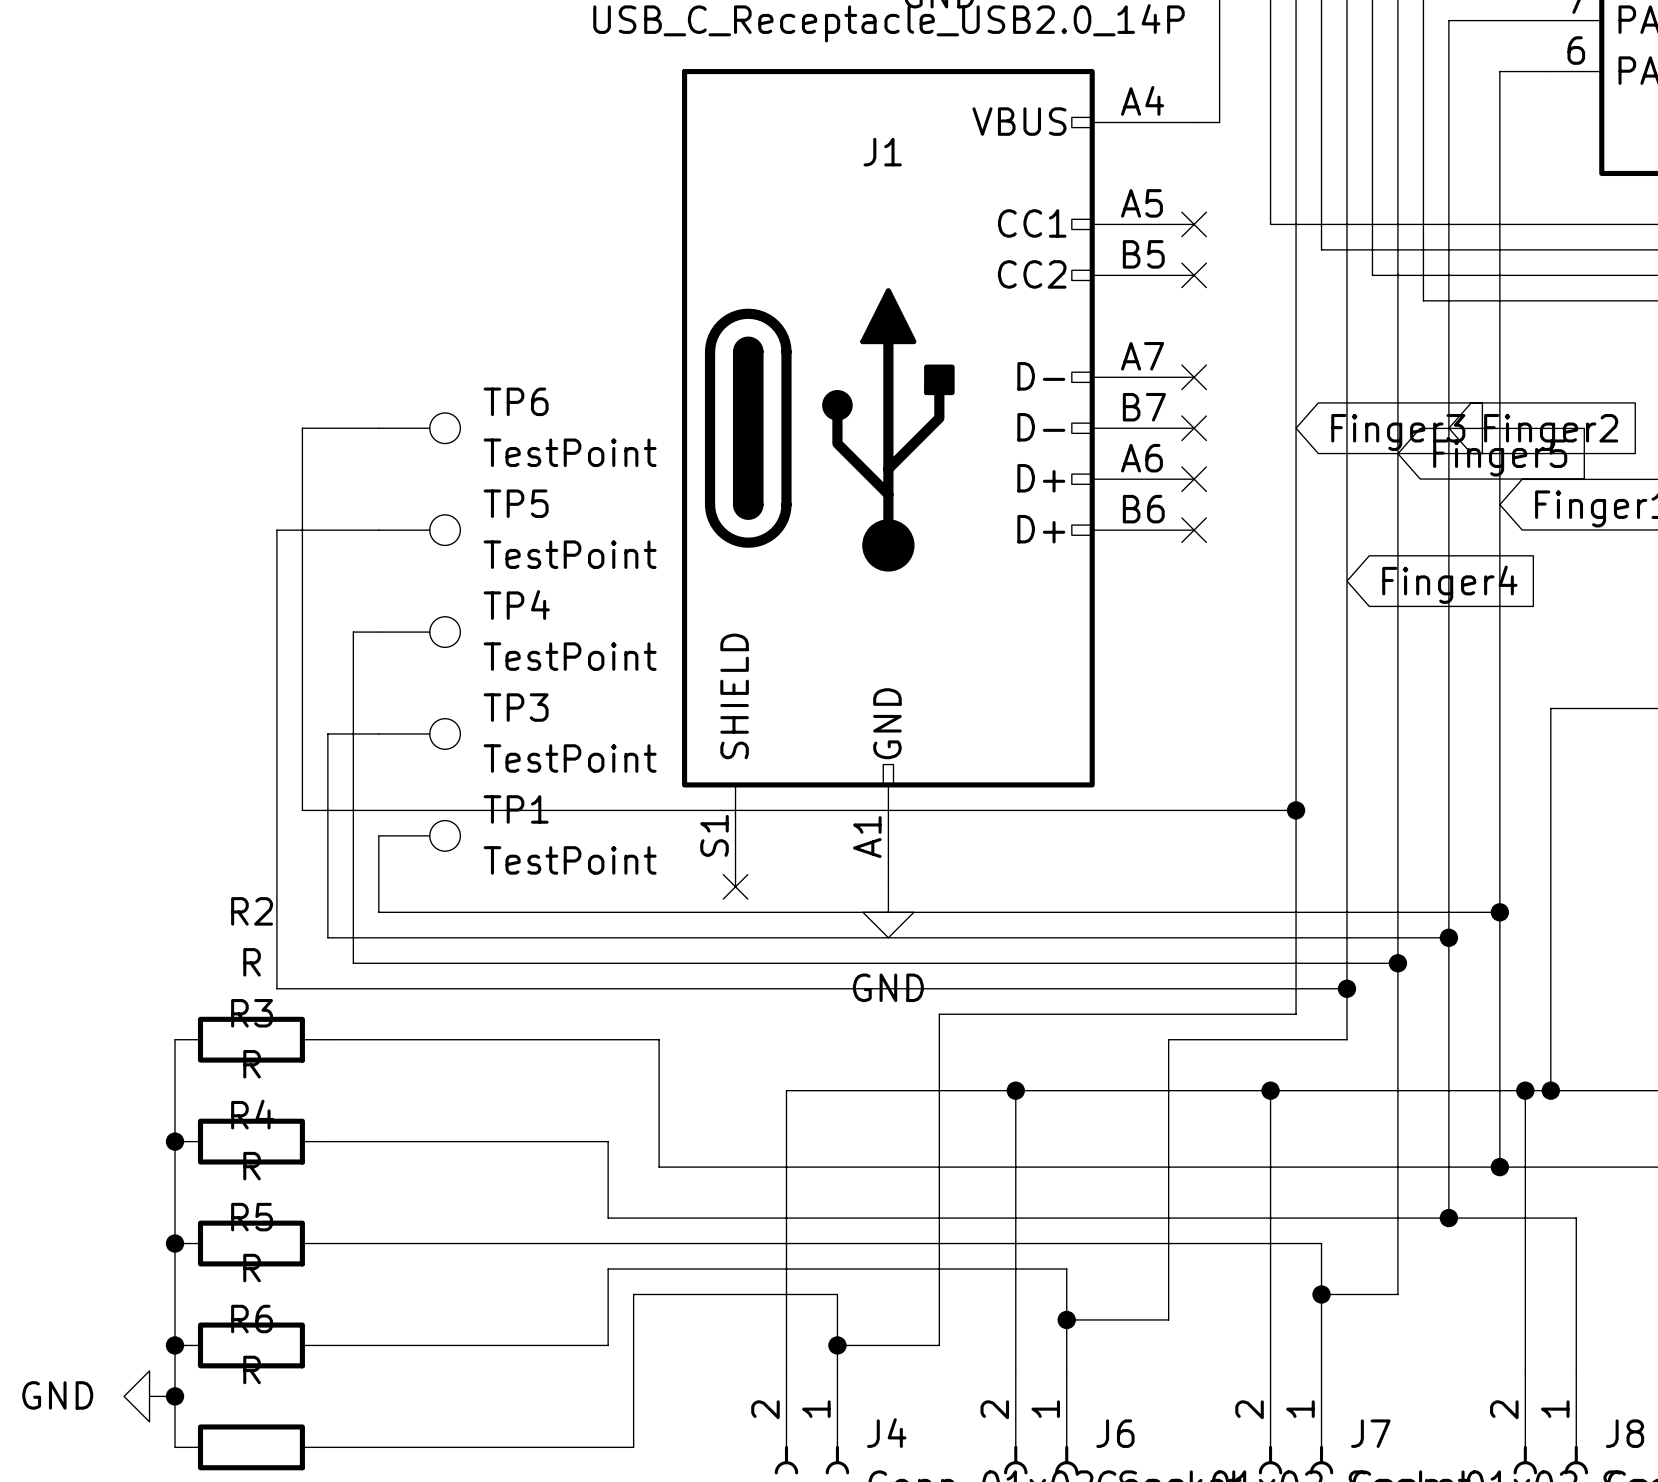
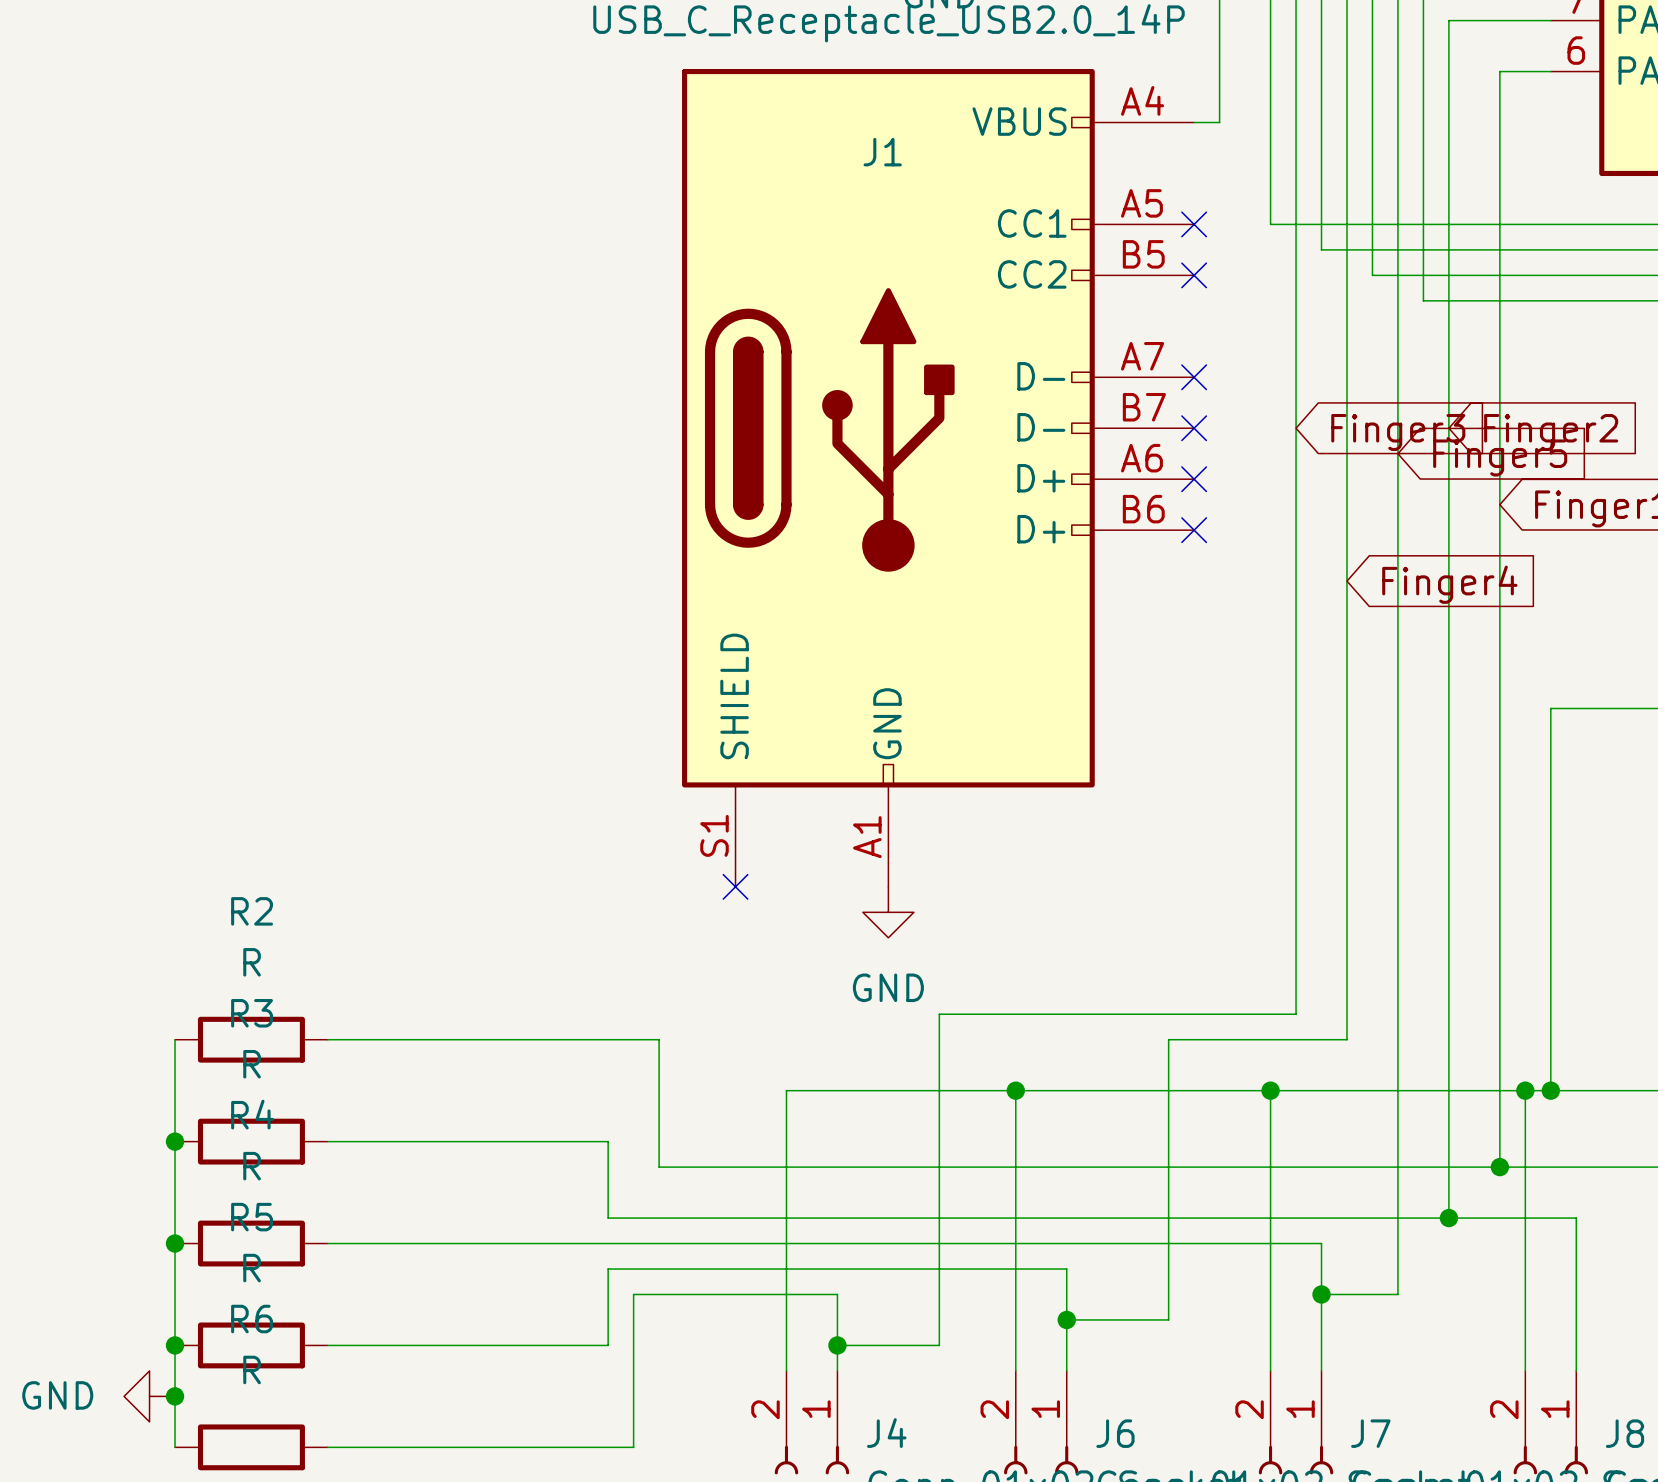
wire: (378, 428) (302, 428) (302, 810) (1296, 810) -> none
TP6: TestPoint (419, 428) -> none
wire: (378, 530) (276, 530) (276, 988) (1346, 988) -> none
TP5: TestPoint (419, 530) -> none
wire: (378, 632) (353, 632) (353, 963) (1397, 963) -> none
TP4: TestPoint (419, 632) -> none
wire: (378, 733) (327, 733) (327, 937) (1448, 937) -> none
TP3: TestPoint (419, 733) -> none
junction: (1296, 810) -> none
wire: (378, 835) (378, 912) (1499, 912) -> none
TP1: TestPoint (419, 835) -> none
junction: (1499, 912) -> none
junction: (1448, 937) -> none
junction: (1397, 963) -> none
junction: (1346, 988) -> none

